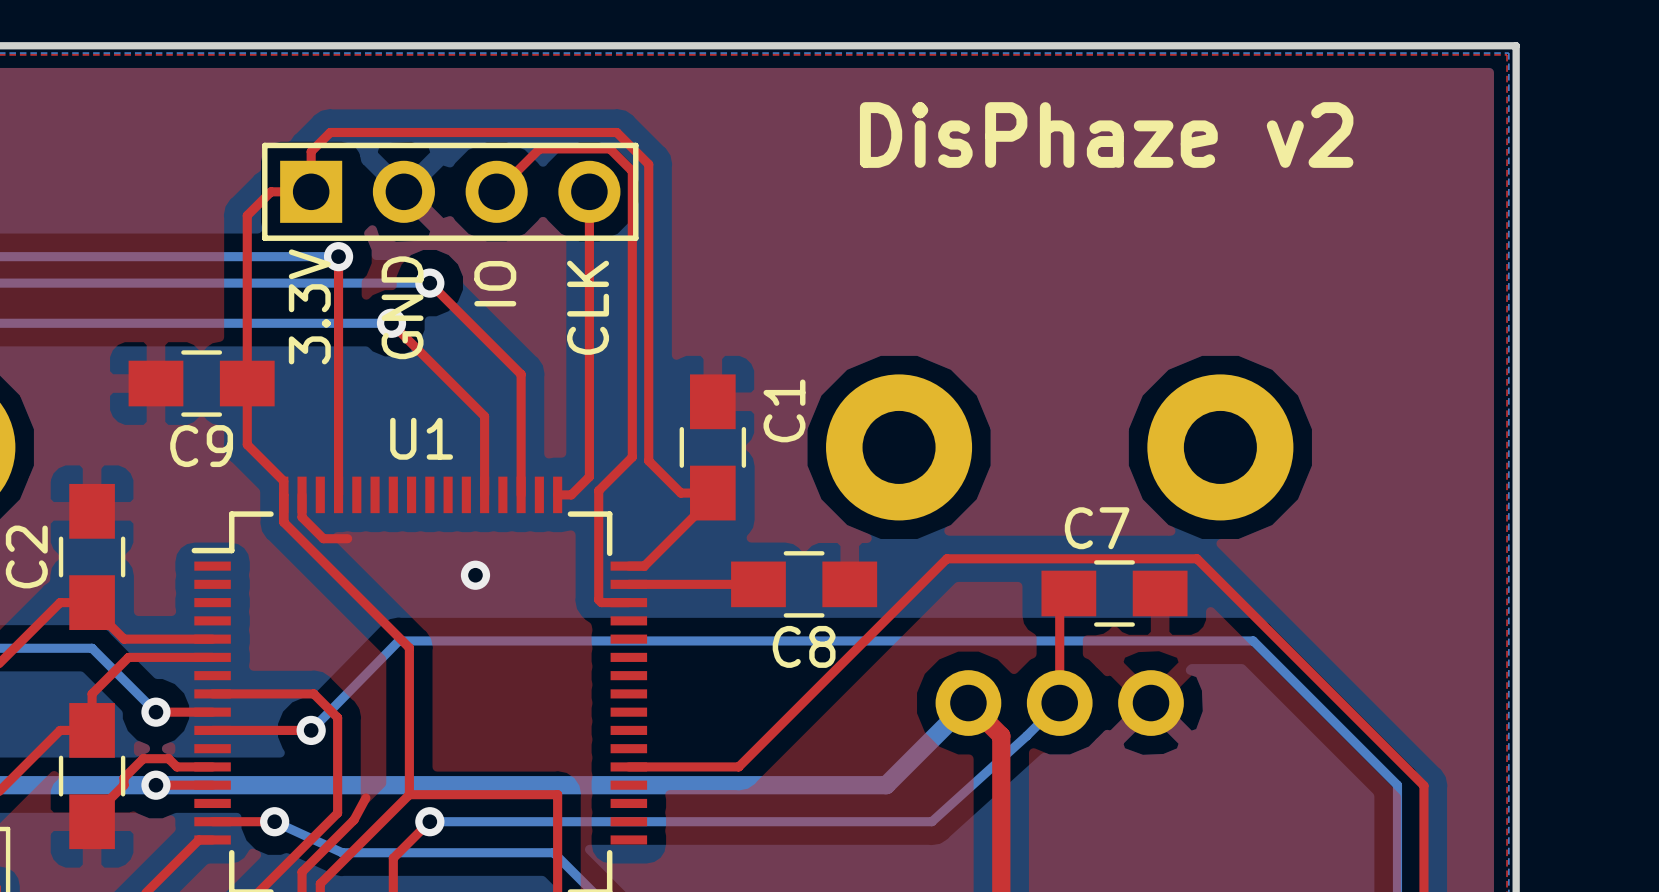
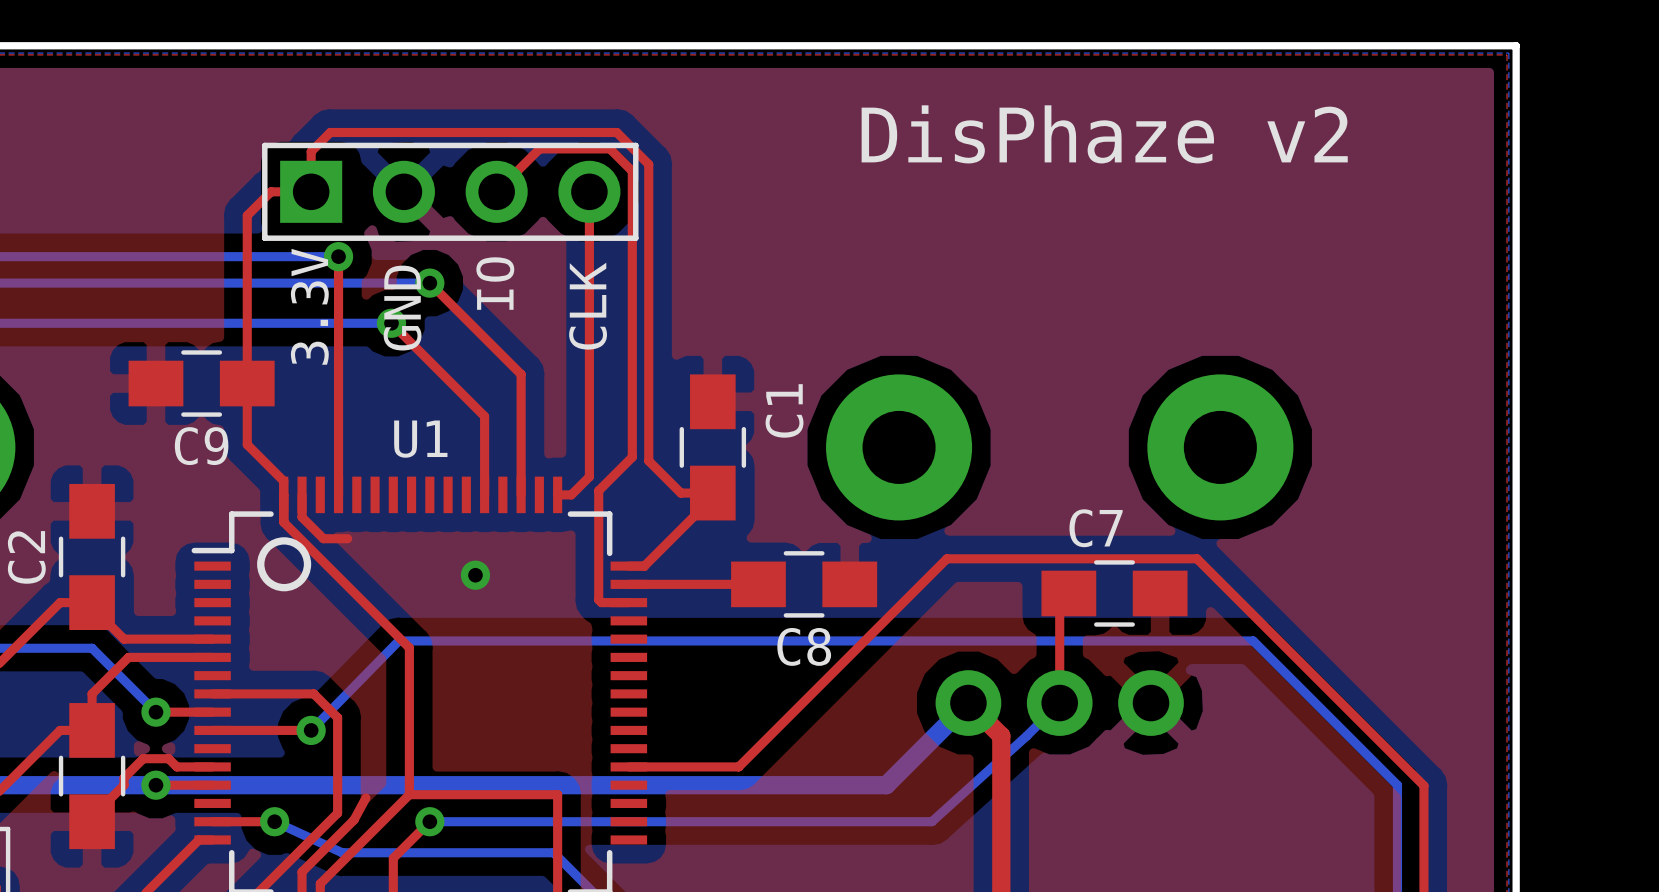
drawing: none -> [257, 537, 312, 592]

